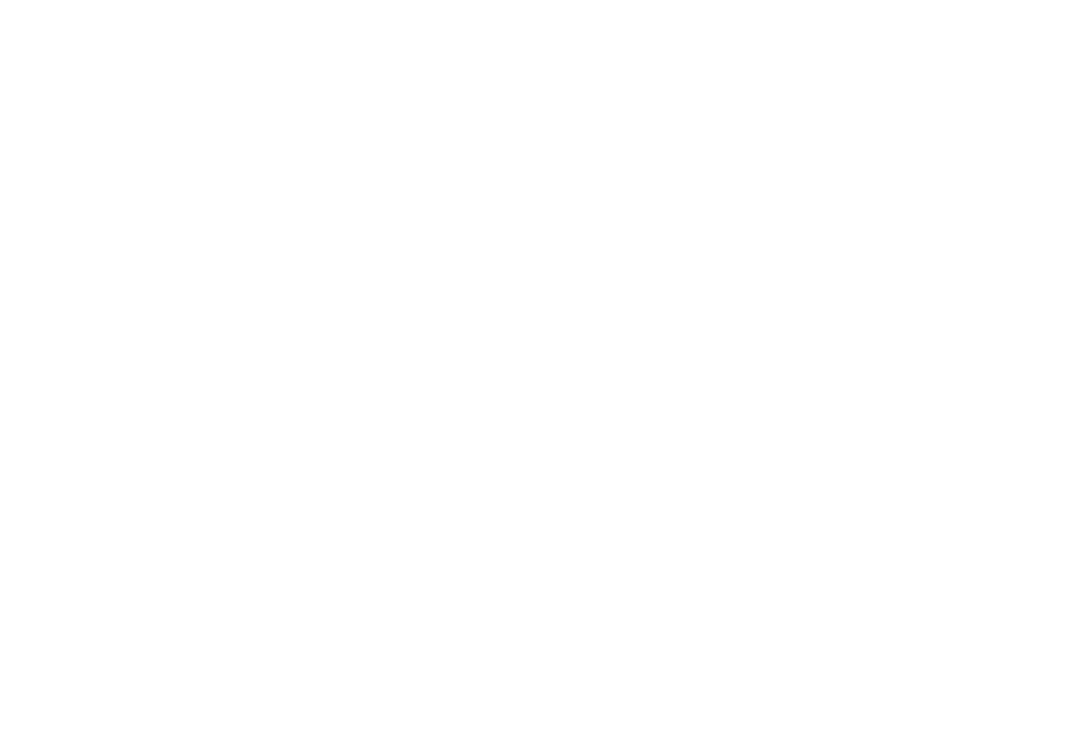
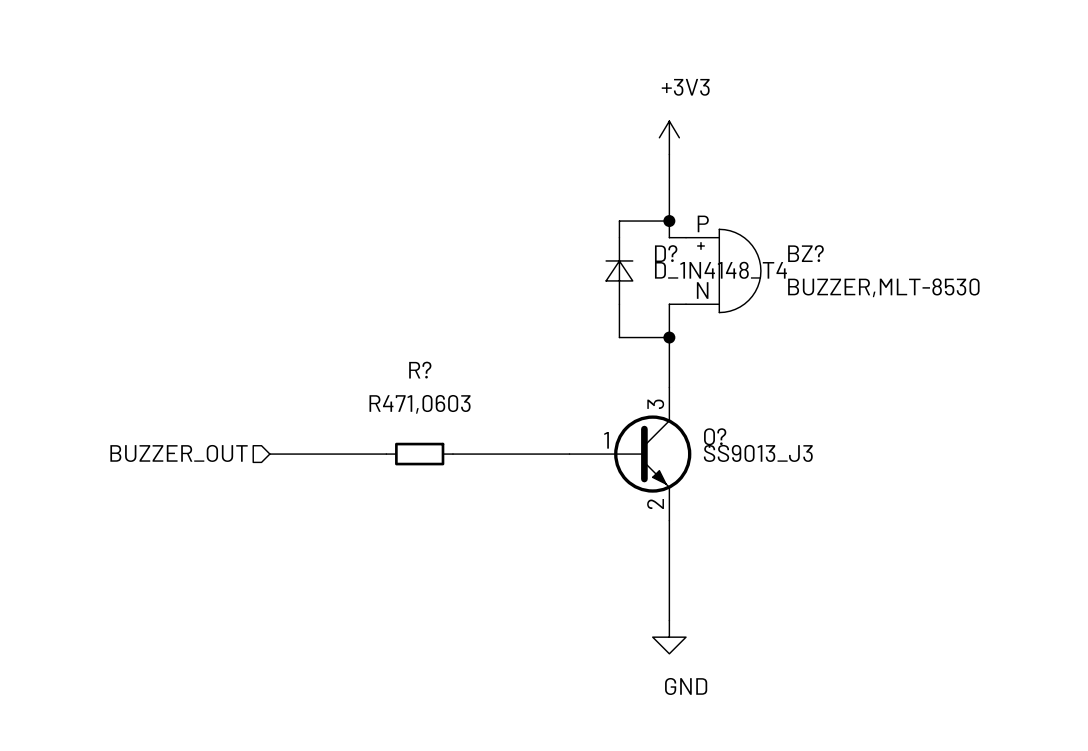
power symbol: none -> +3V3 (669, 137)
wire: none -> (669, 154) (669, 237) (686, 237)
wire: none -> (669, 221) (619, 221) (619, 237)
junction: none -> (669, 221)
D?: none -> D_1N4148_T4 (619, 270)
BZ?: none -> BUZZER,MLT-8530 (723, 270)
wire: none -> (619, 304) (619, 337) (669, 337)
wire: none -> (686, 304) (669, 304) (669, 387)
junction: none -> (669, 337)
wire: none -> (269, 454) (386, 454)
R?: none -> R471,0603 (419, 454)
wire: none -> (452, 454) (569, 454)
Q?: none -> SS9013_J3 (630, 454)
hierarchical label: none -> BUZZER_OUT (179, 453)
wire: none -> (669, 520) (669, 620)
power symbol: none -> GND (669, 637)

